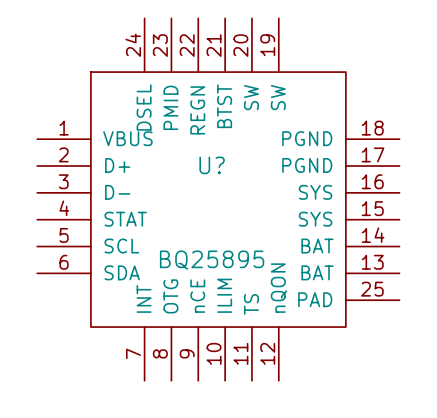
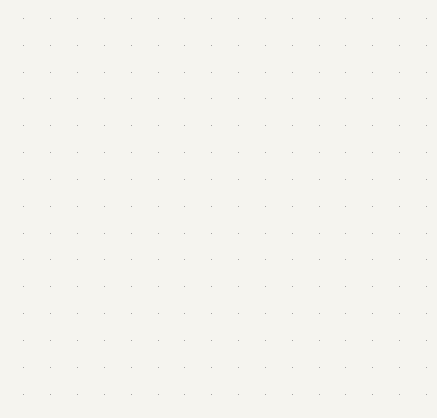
U?: BQ25895 (218, 199) -> none

